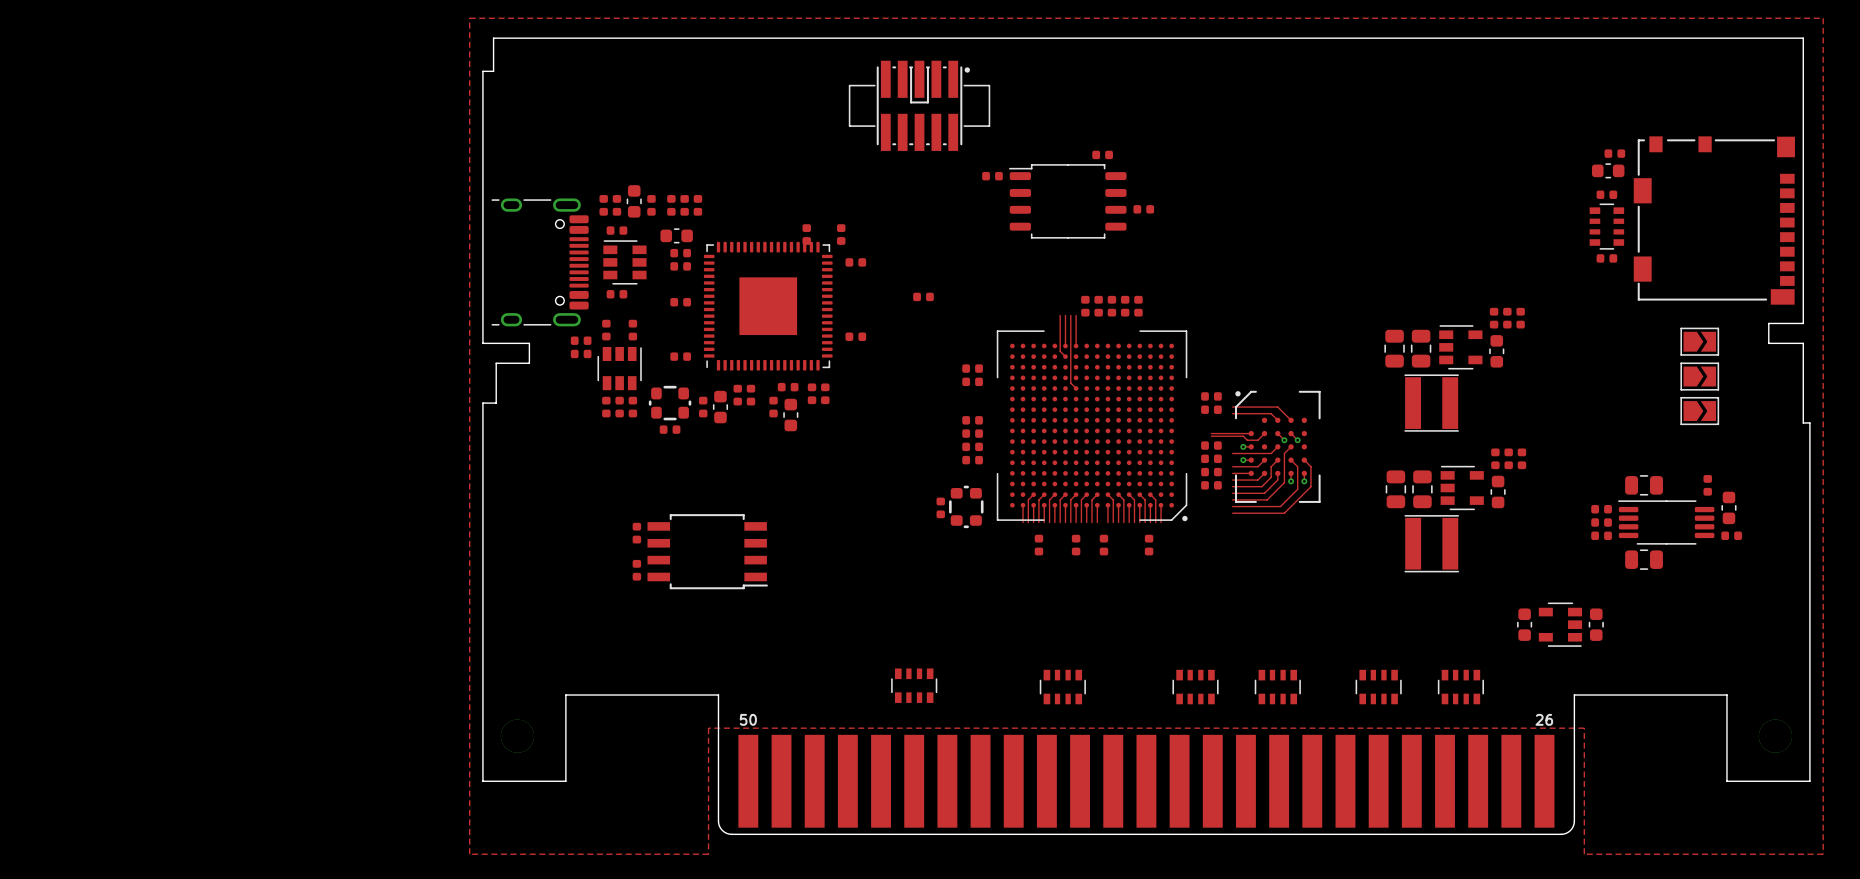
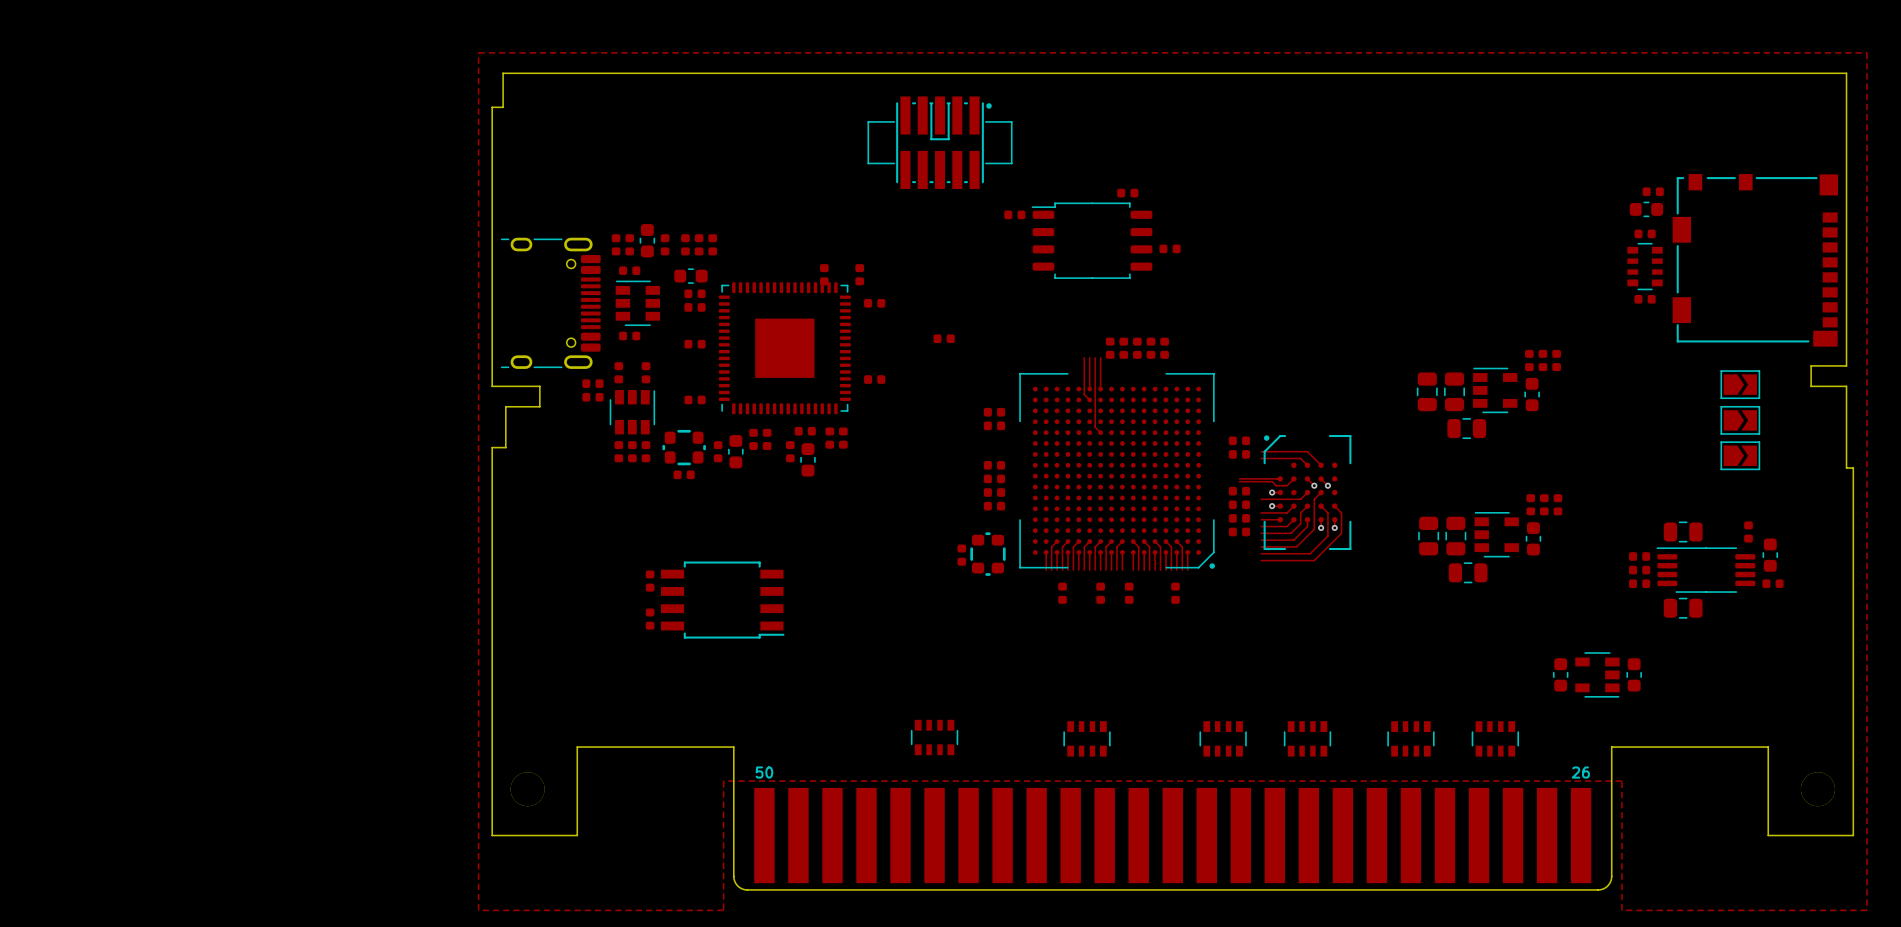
part: none -> (1466, 428)
part: (1431, 403) -> none
part: none -> (1468, 572)
part: (1431, 543) -> none

